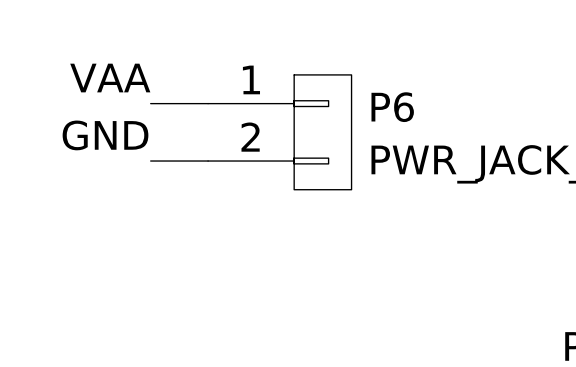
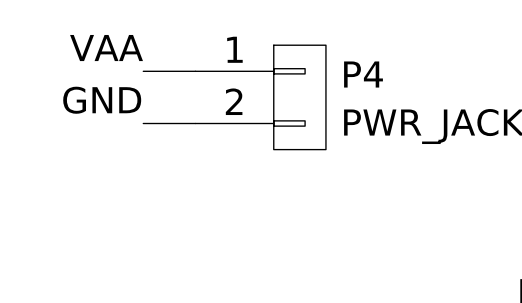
P6 name: P6 (392, 107) -> P4 (363, 74)

